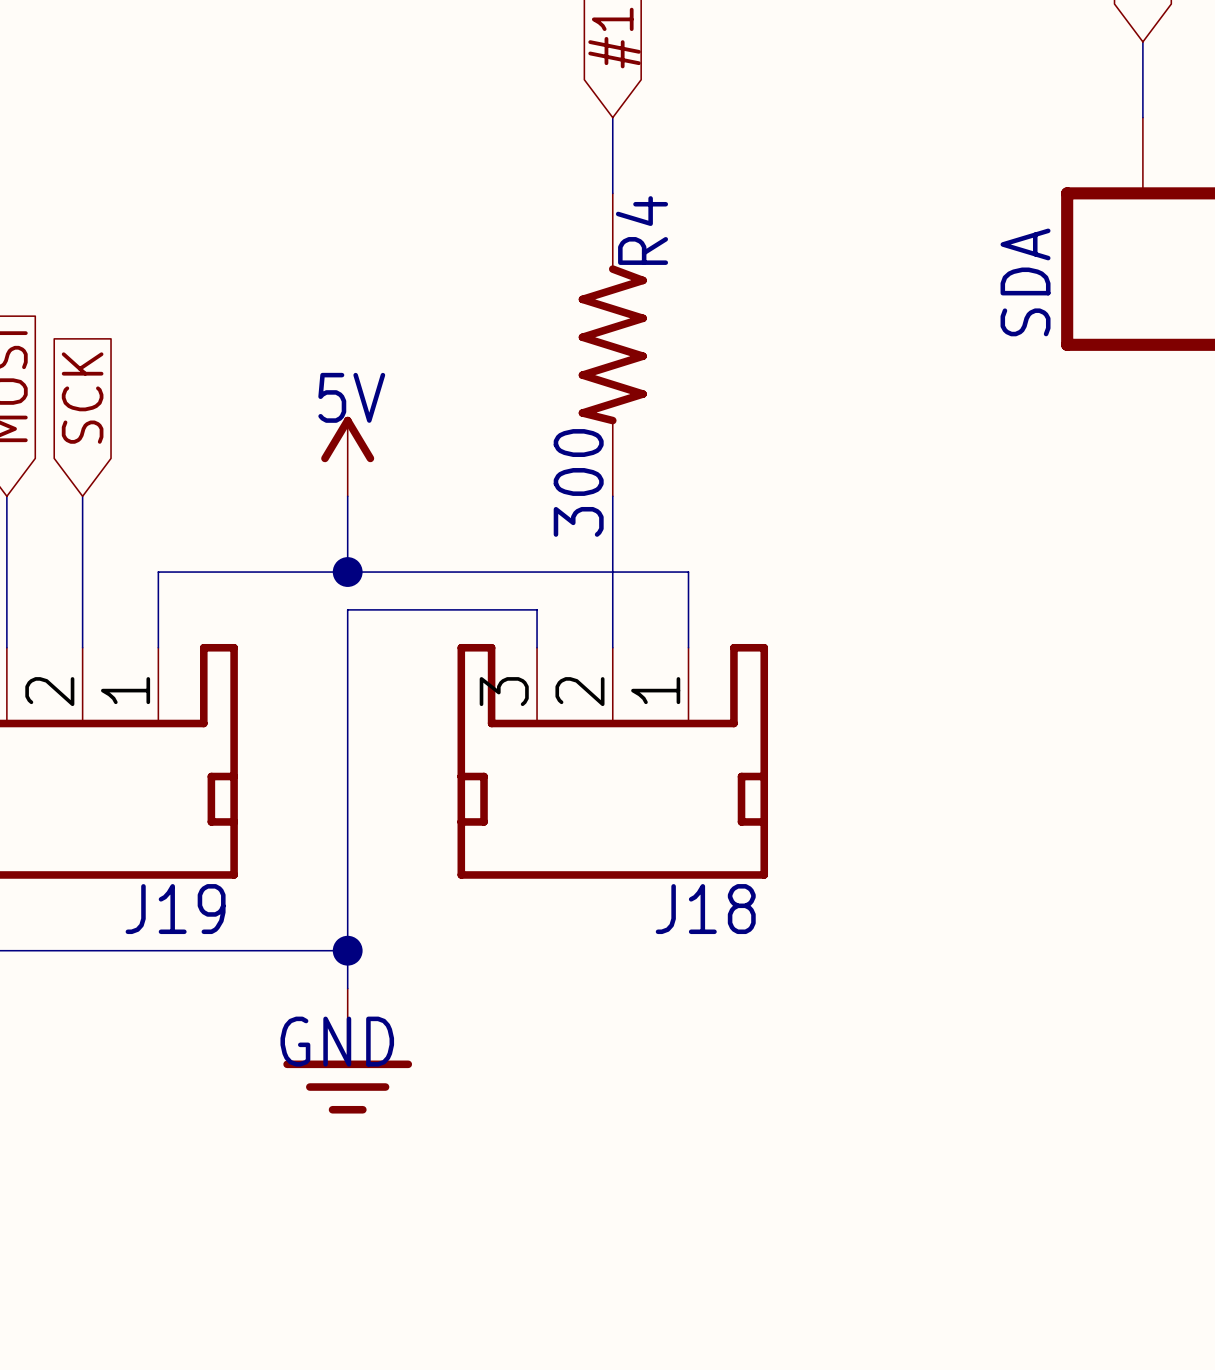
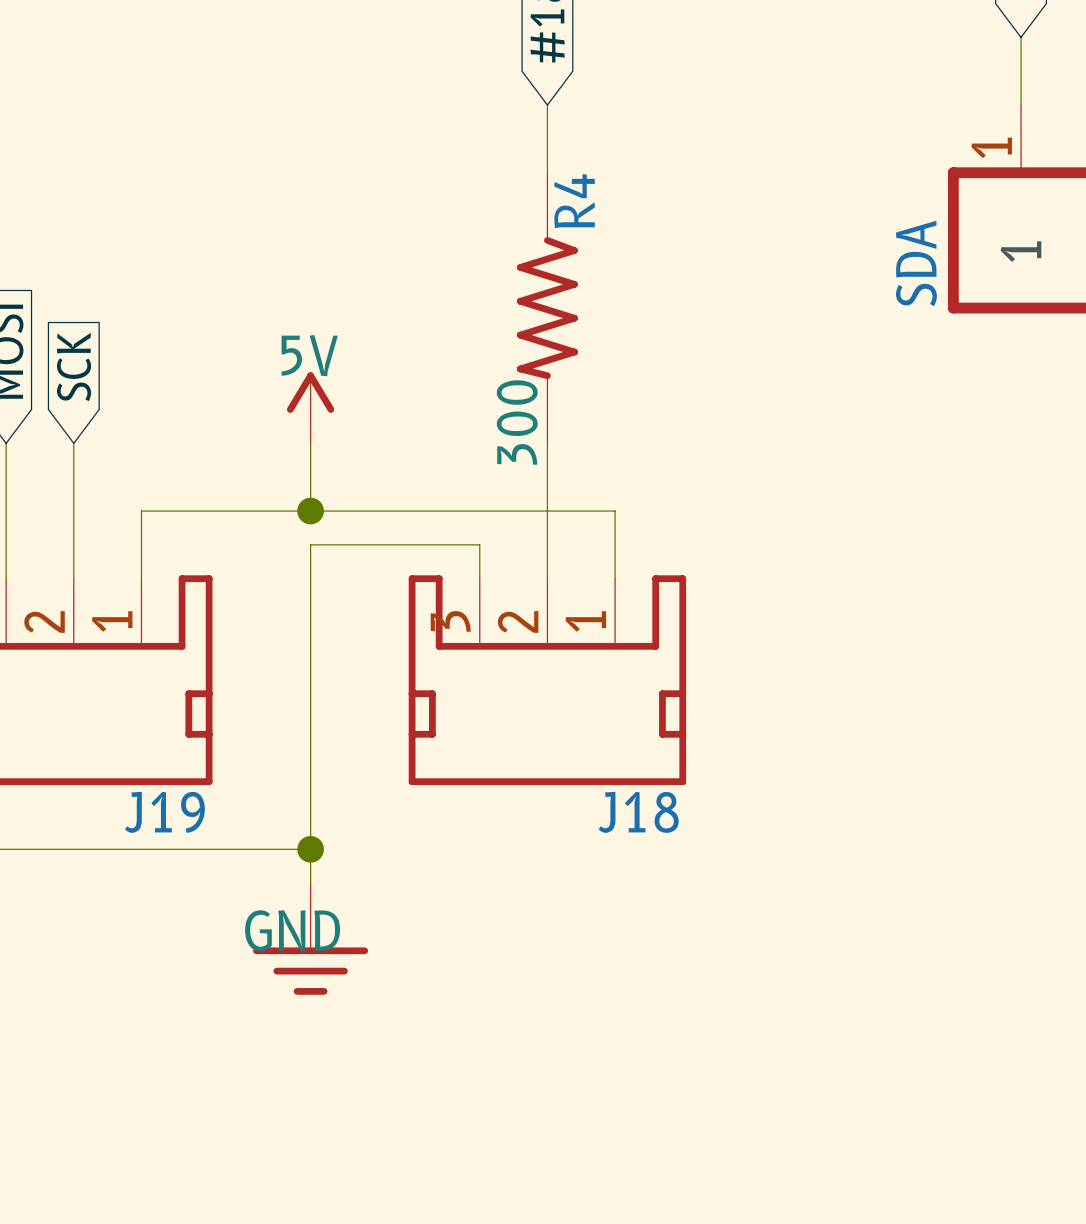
SDA pin number: none -> 1 (991, 147)
SDA pin name: none -> 1 (1021, 251)

